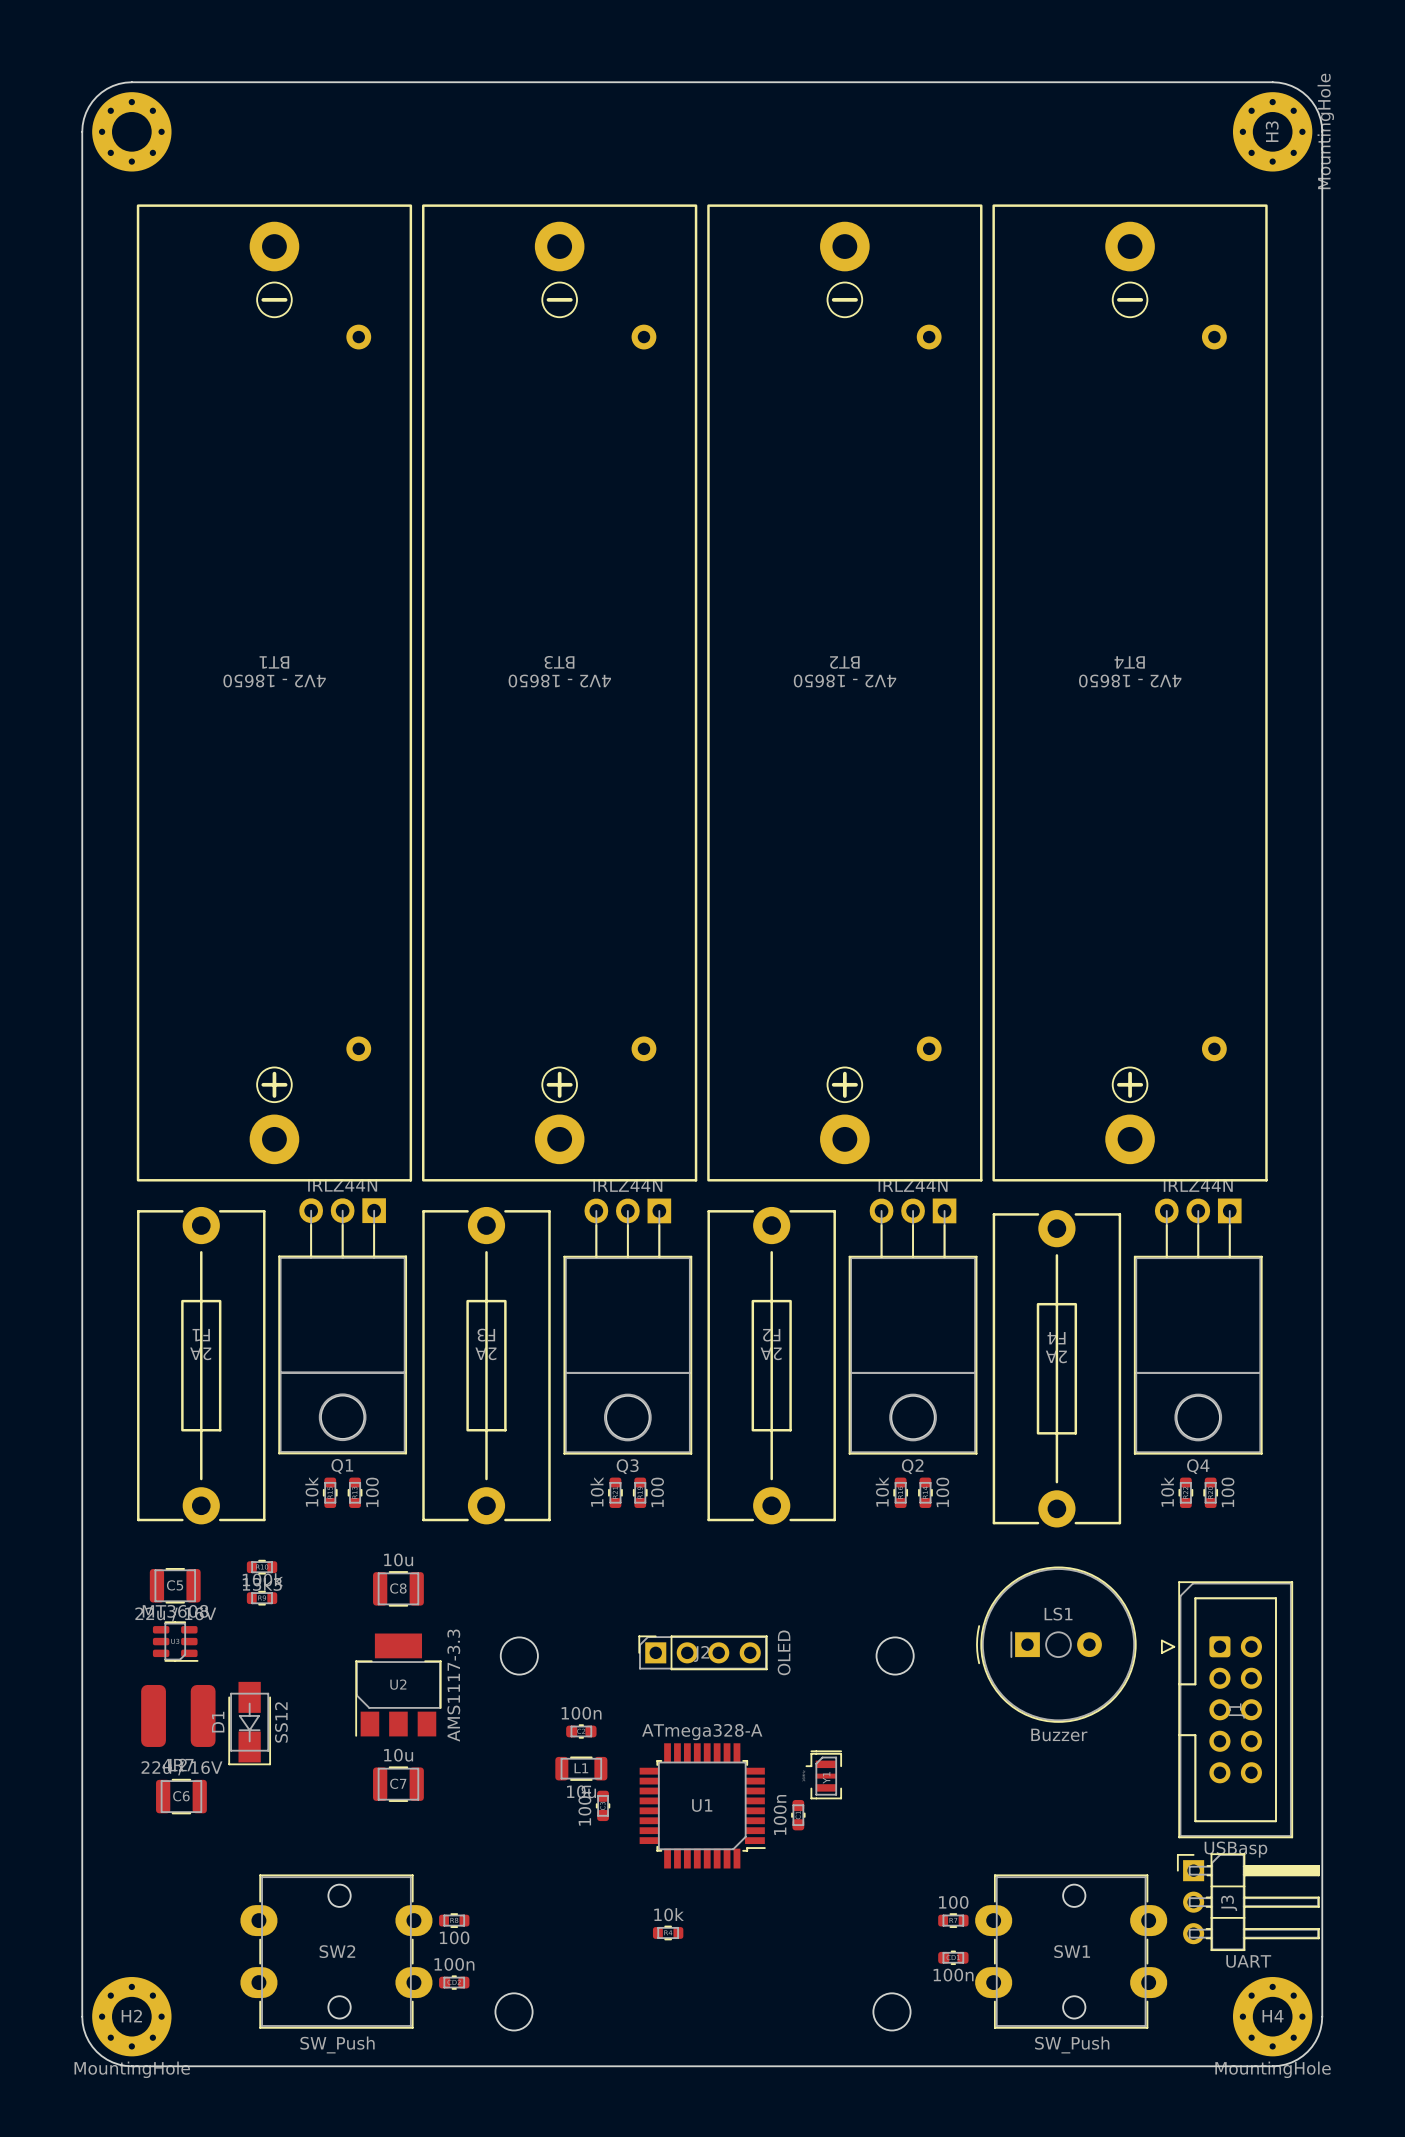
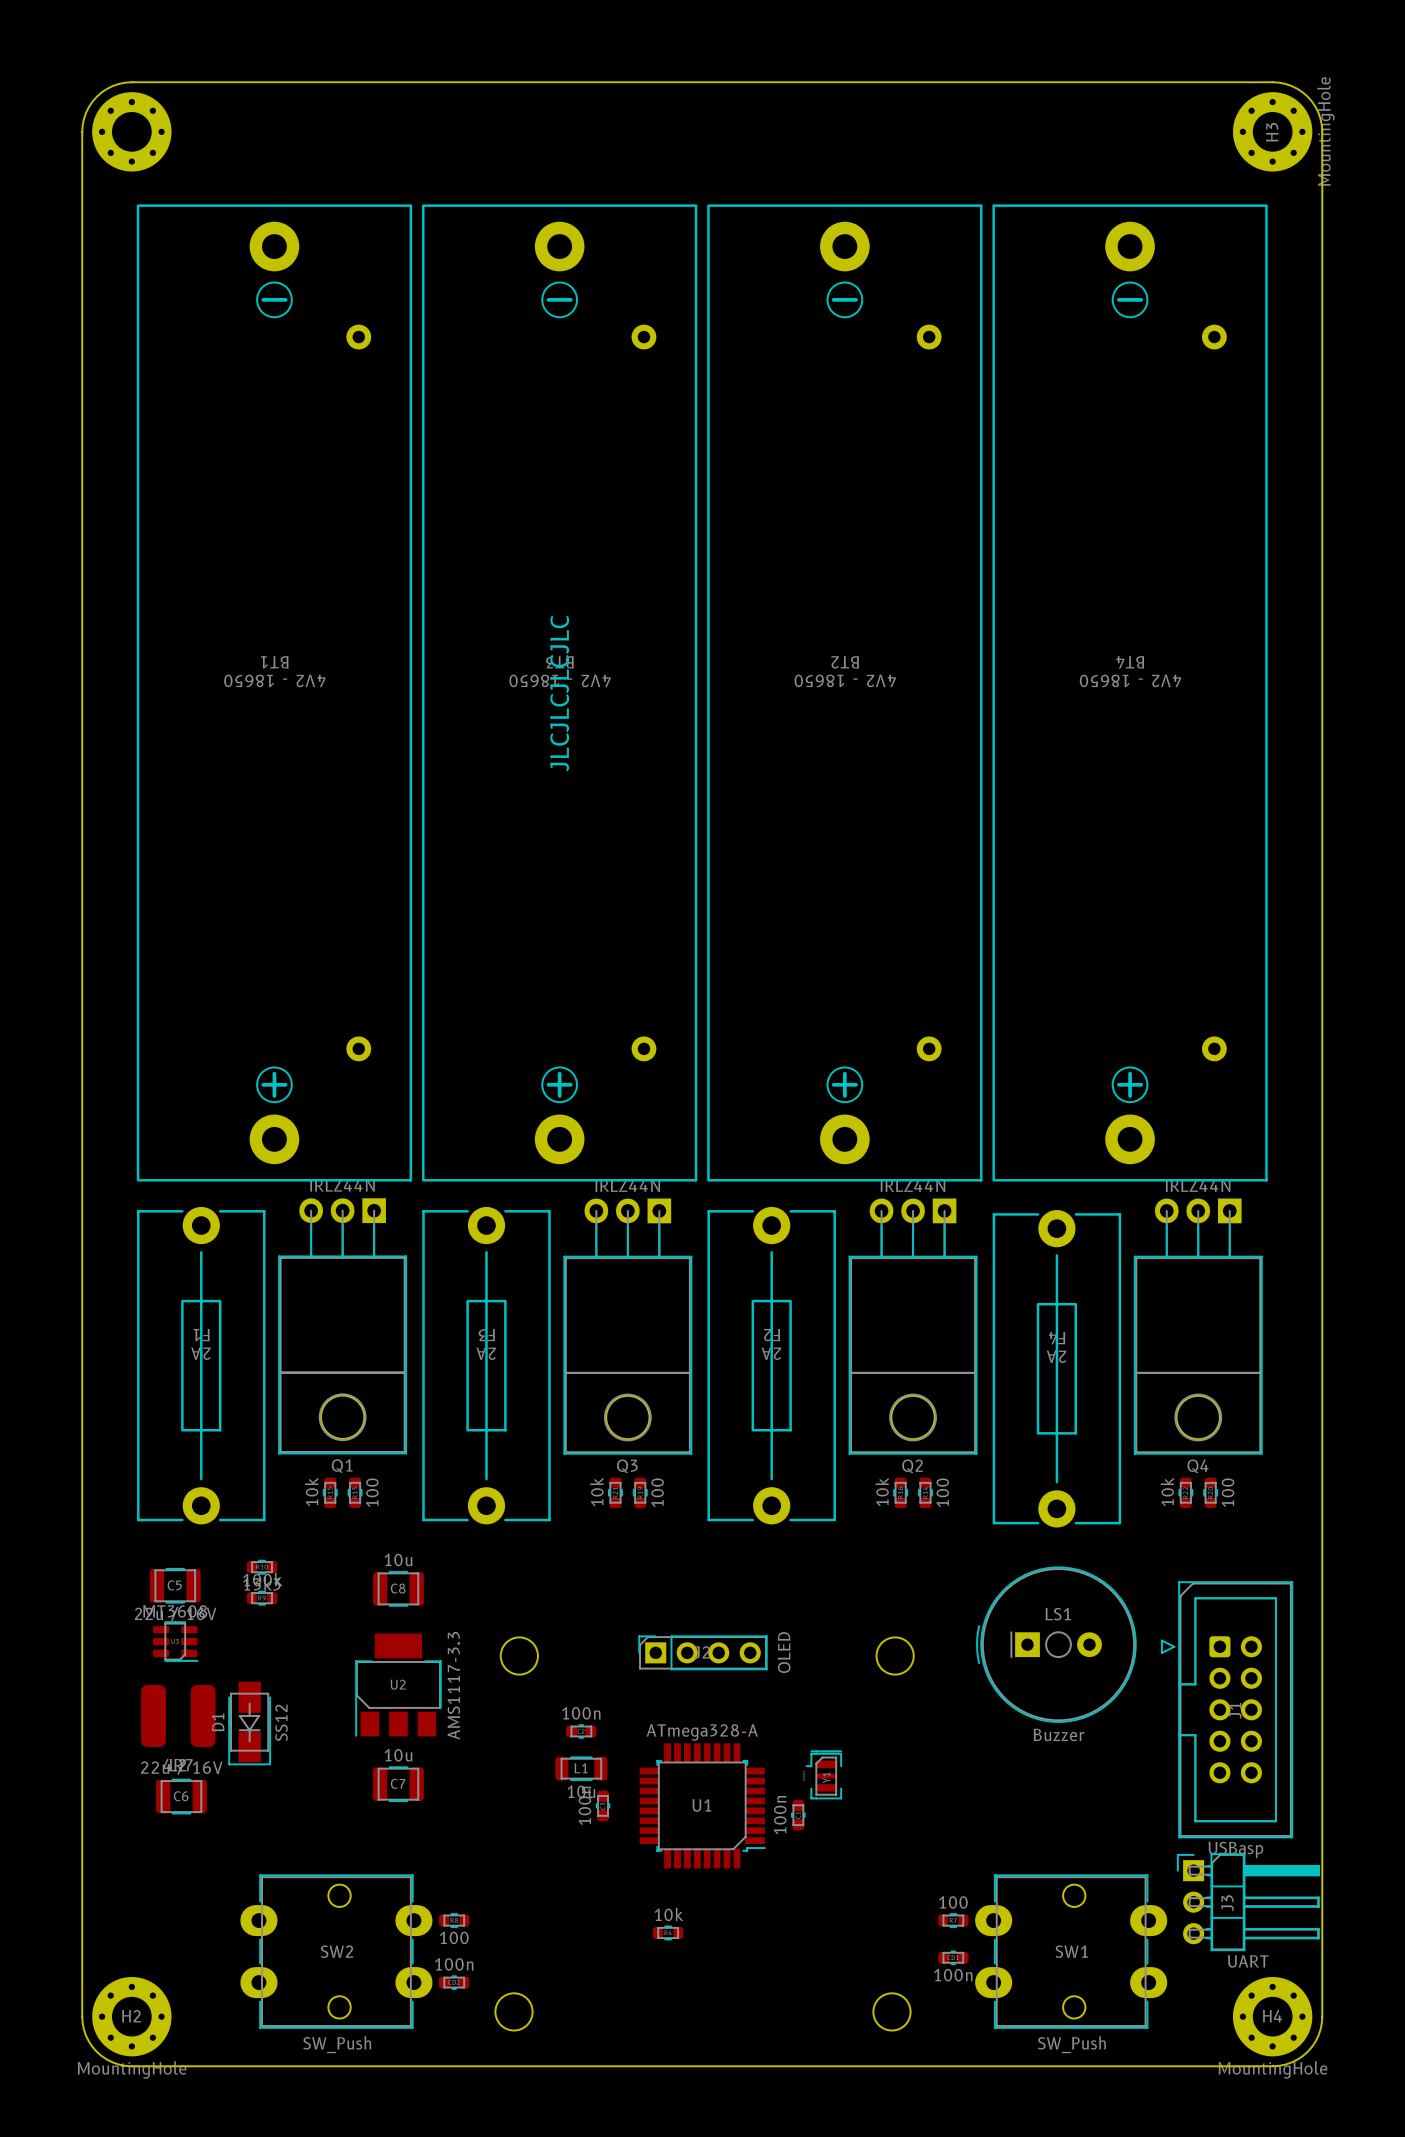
text: none -> JLCJLCJLCJLC (559, 693)

